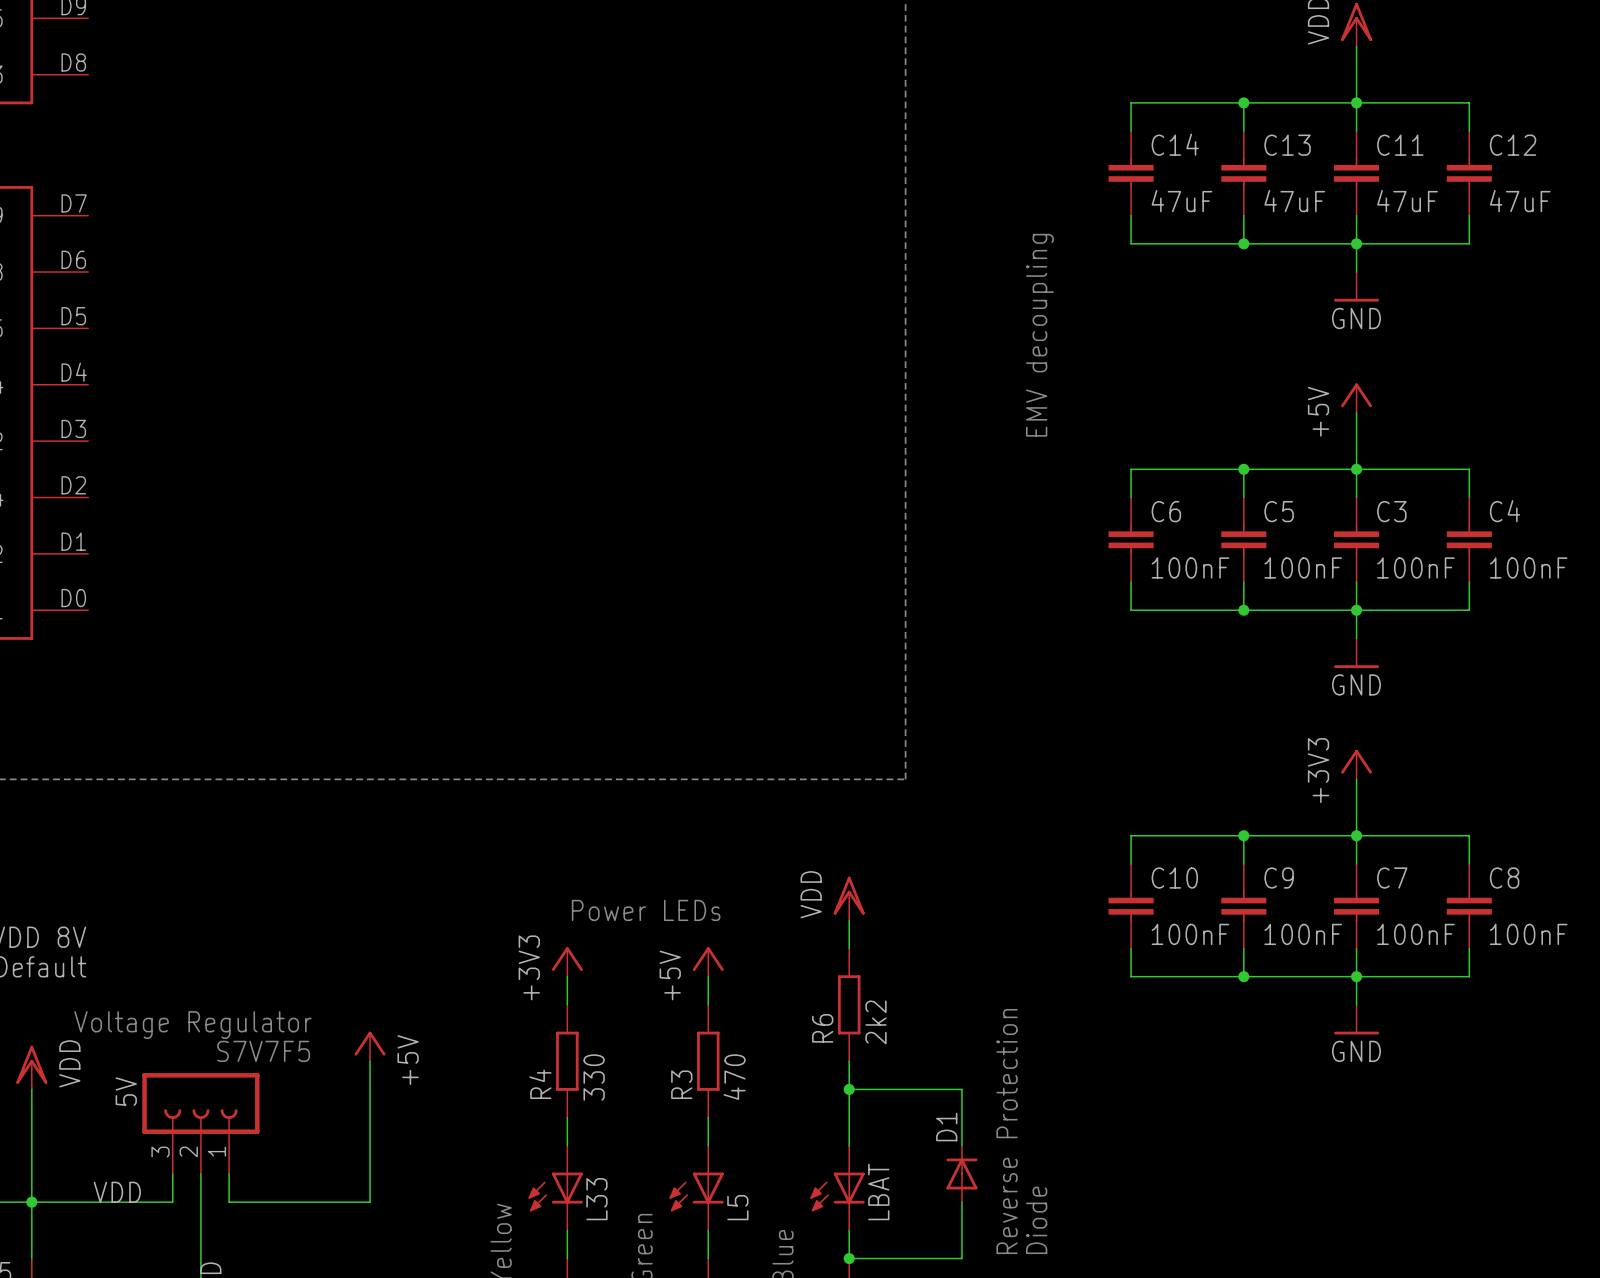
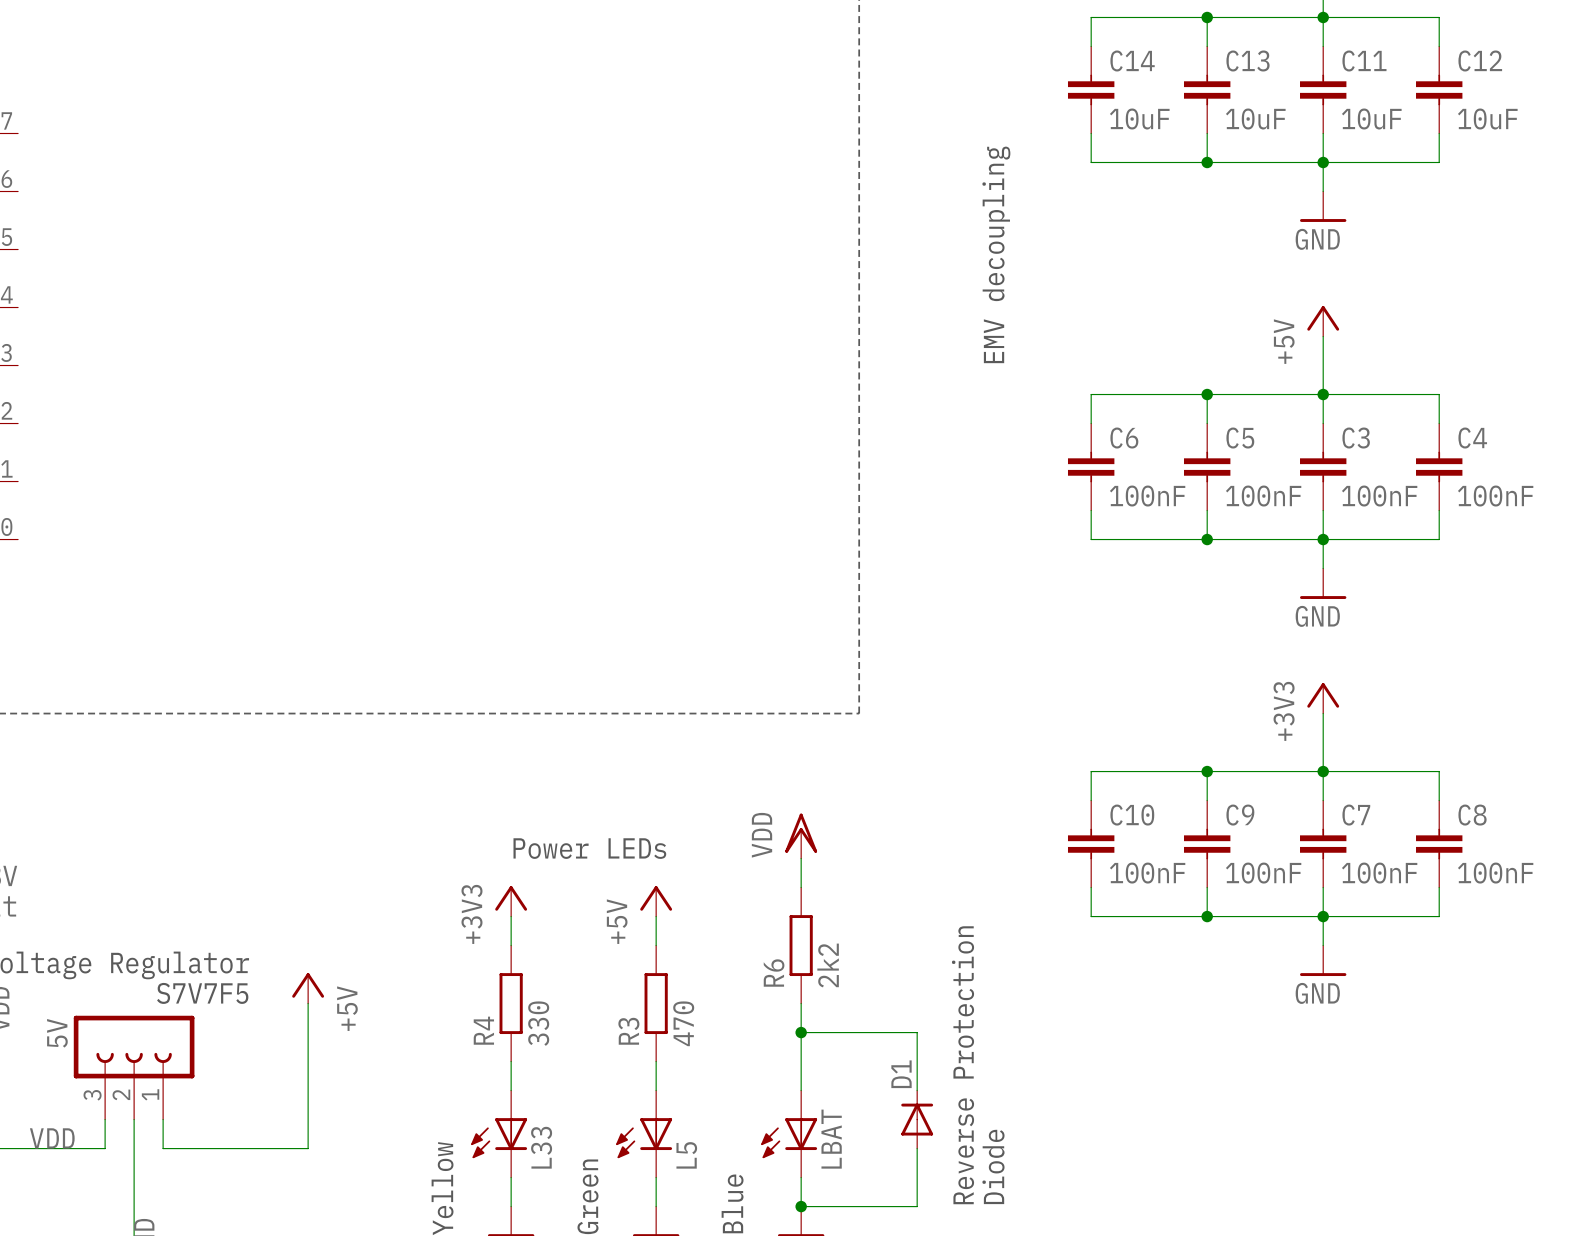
C14 value: 47uF (1182, 201) -> 10uF (1139, 118)
C13 value: 47uF (1294, 201) -> 10uF (1255, 118)
C11 value: 47uF (1407, 201) -> 10uF (1371, 118)
C12 value: 47uF (1520, 201) -> 10uF (1487, 118)

